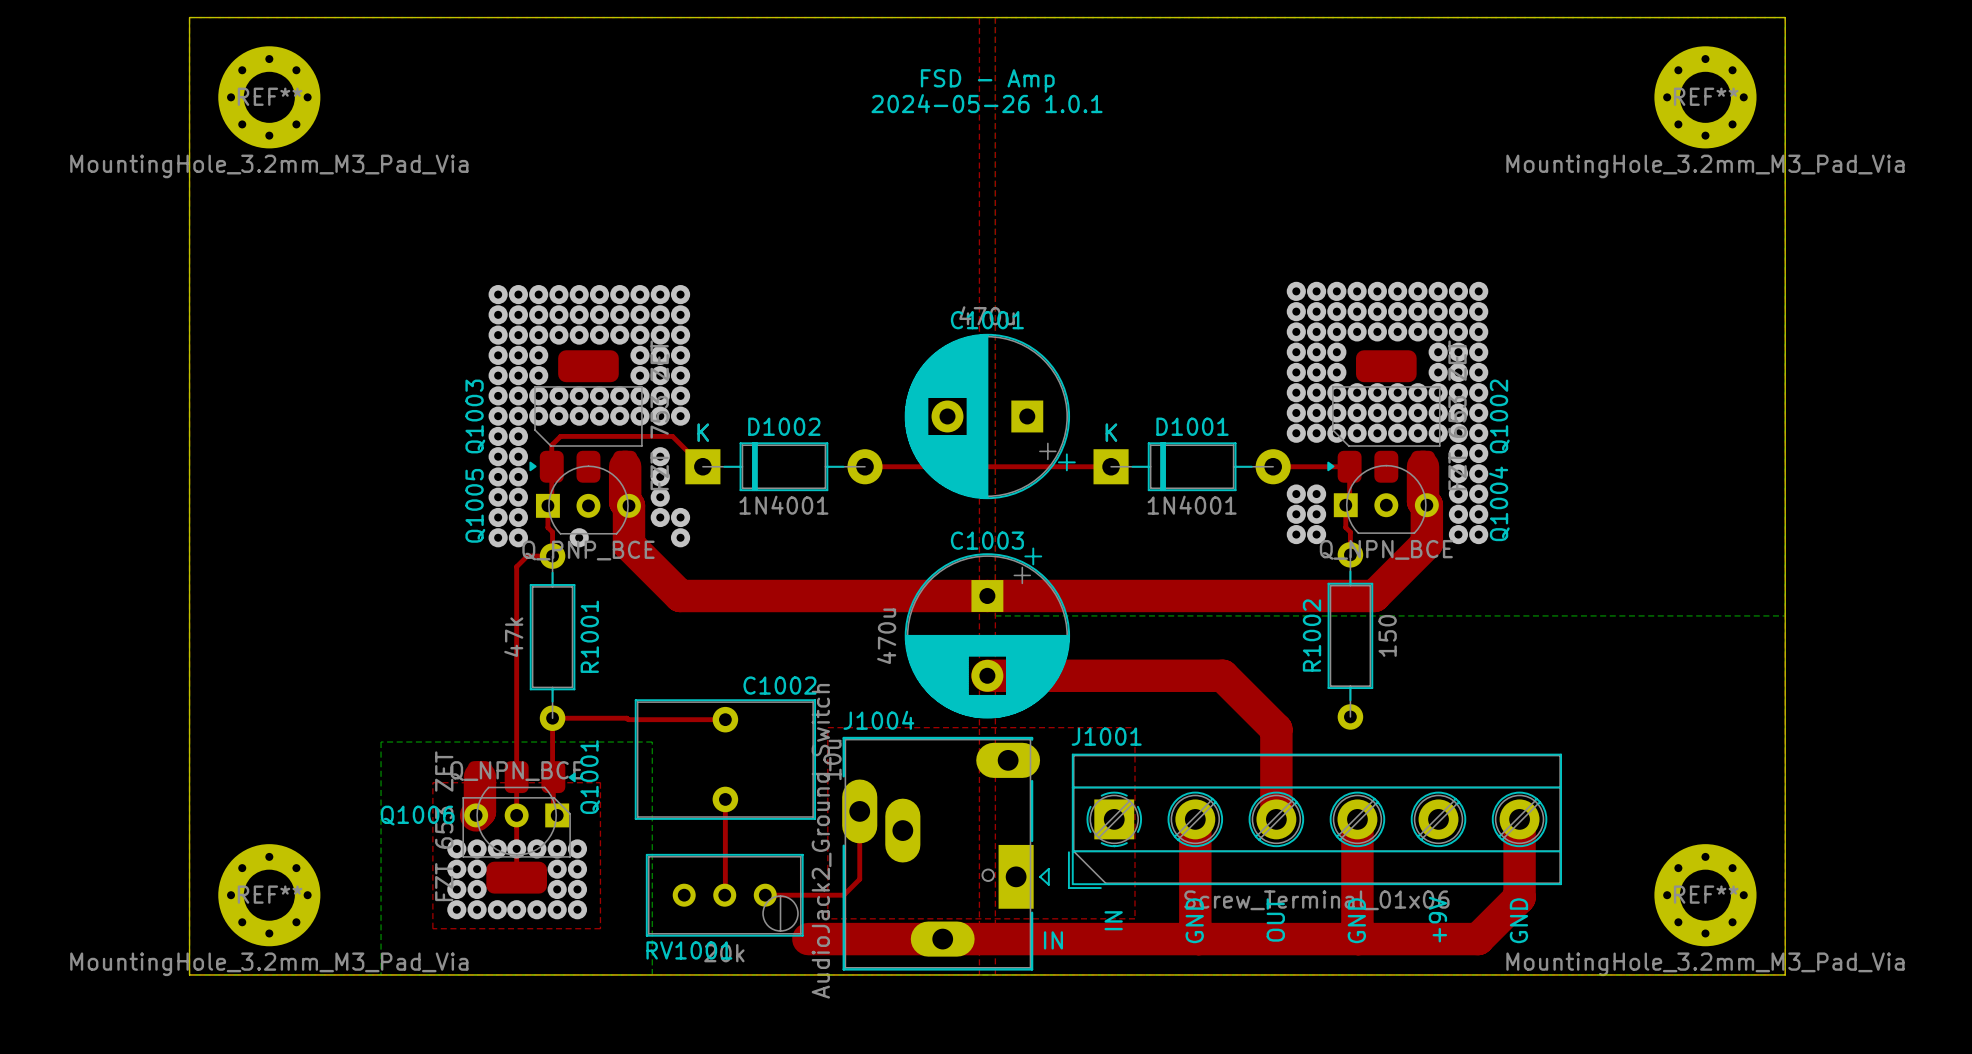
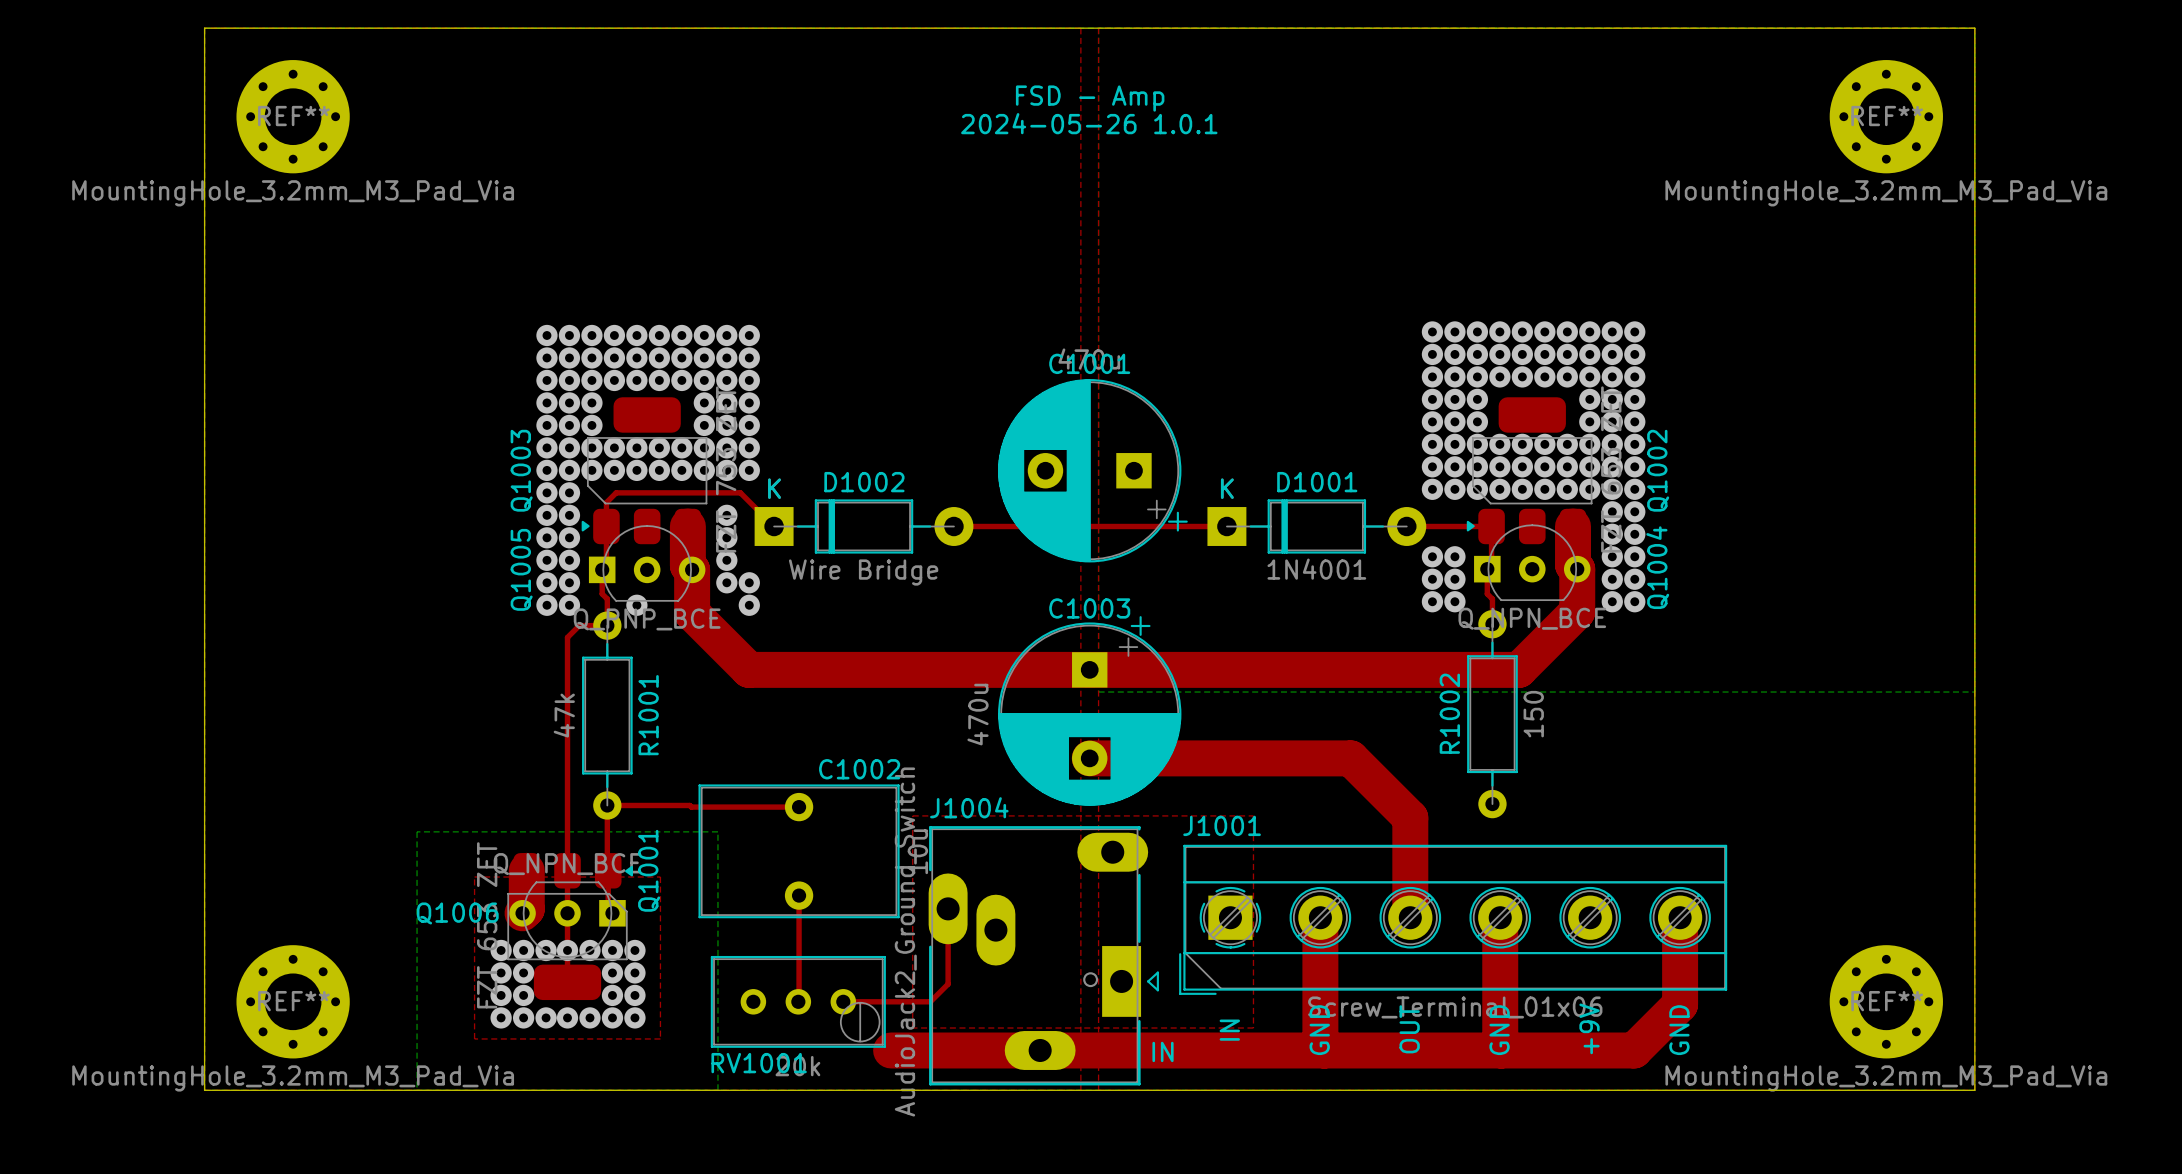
D1002 value: 1N4001 (783, 505) -> Wire Bridge (863, 572)

